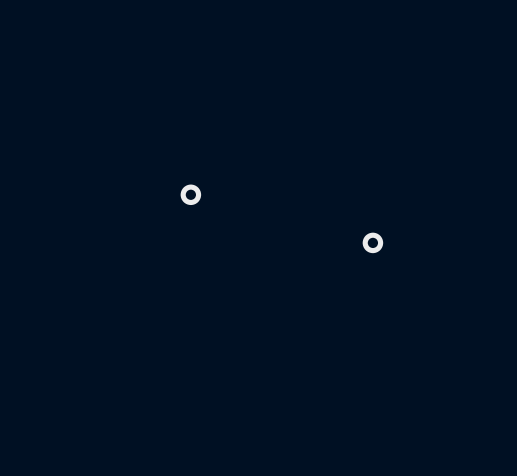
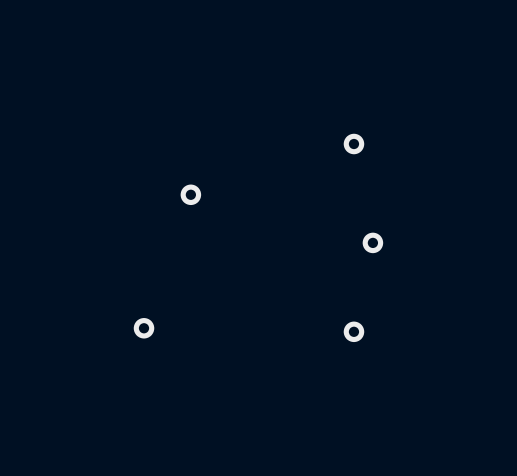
via: none -> (353, 144)
via: none -> (144, 328)
via: none -> (353, 331)

